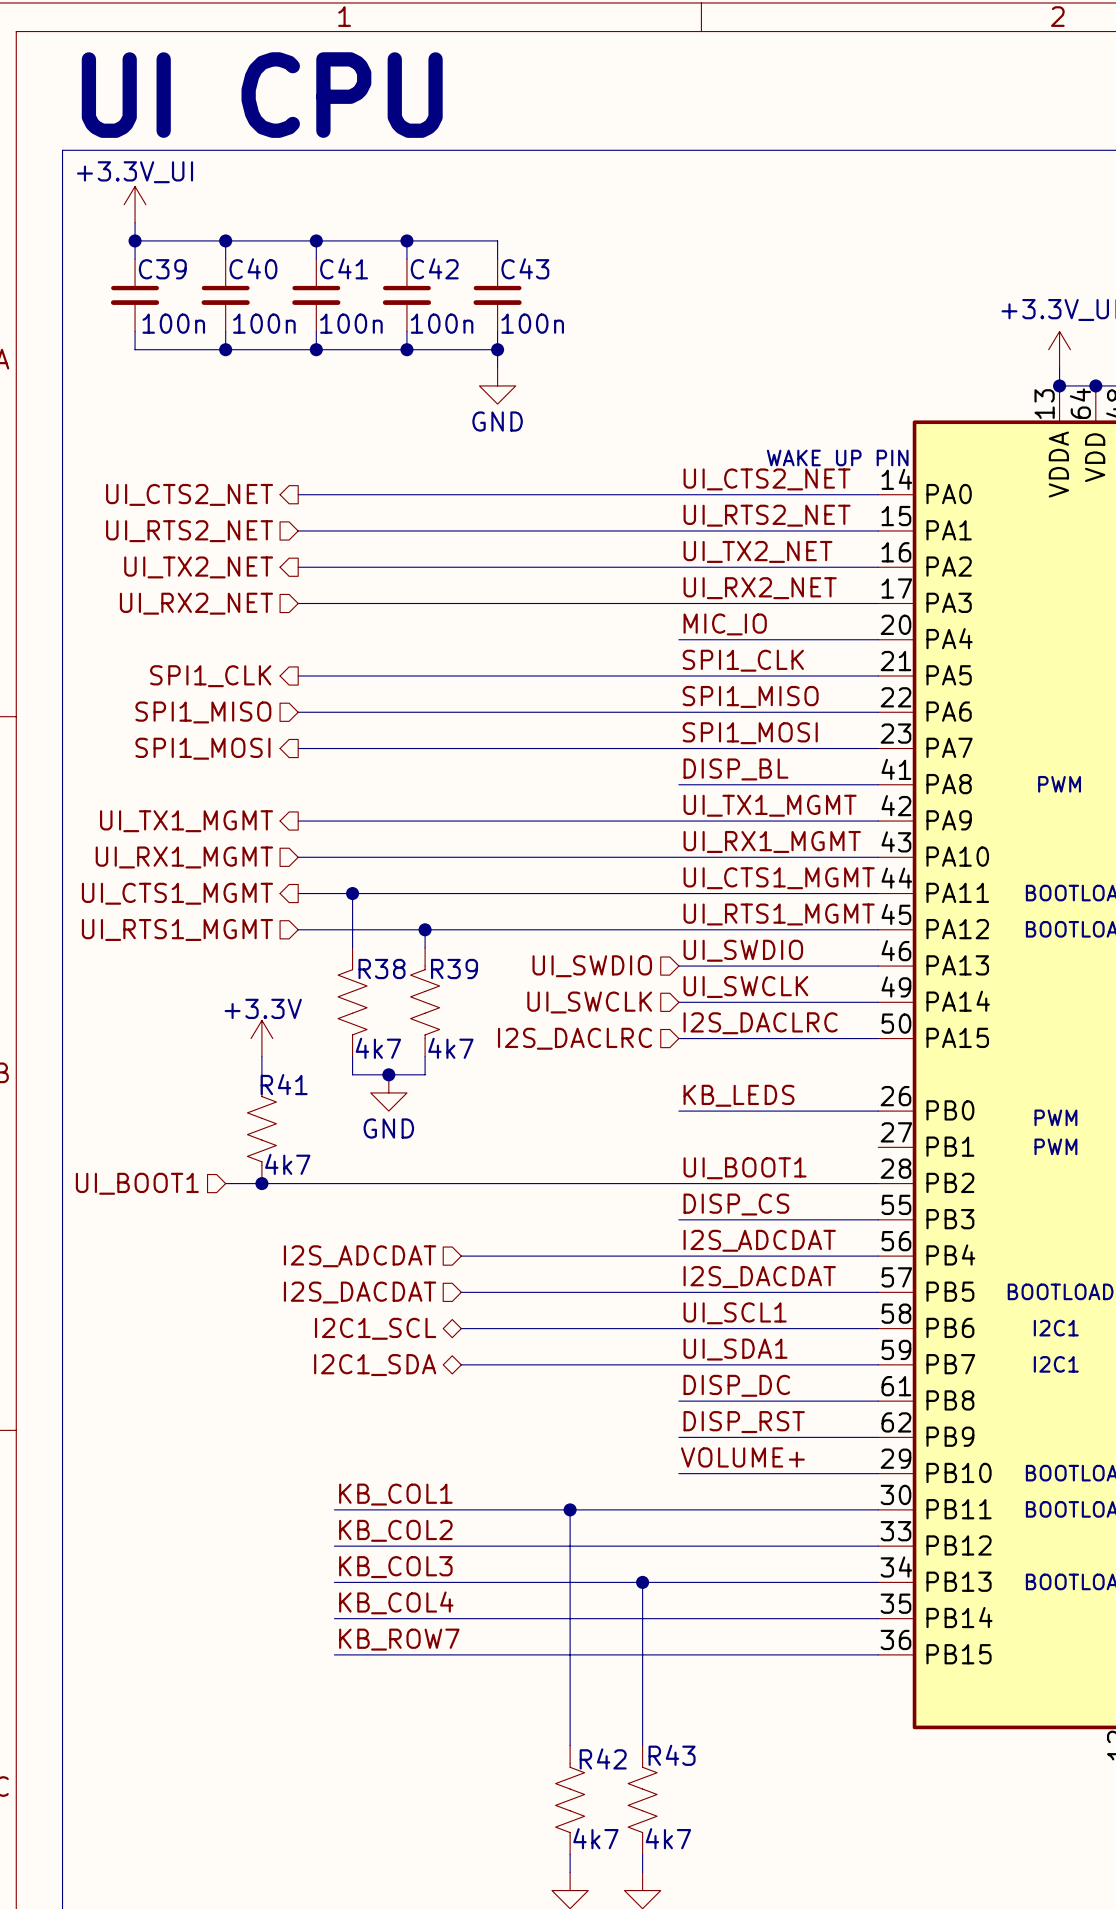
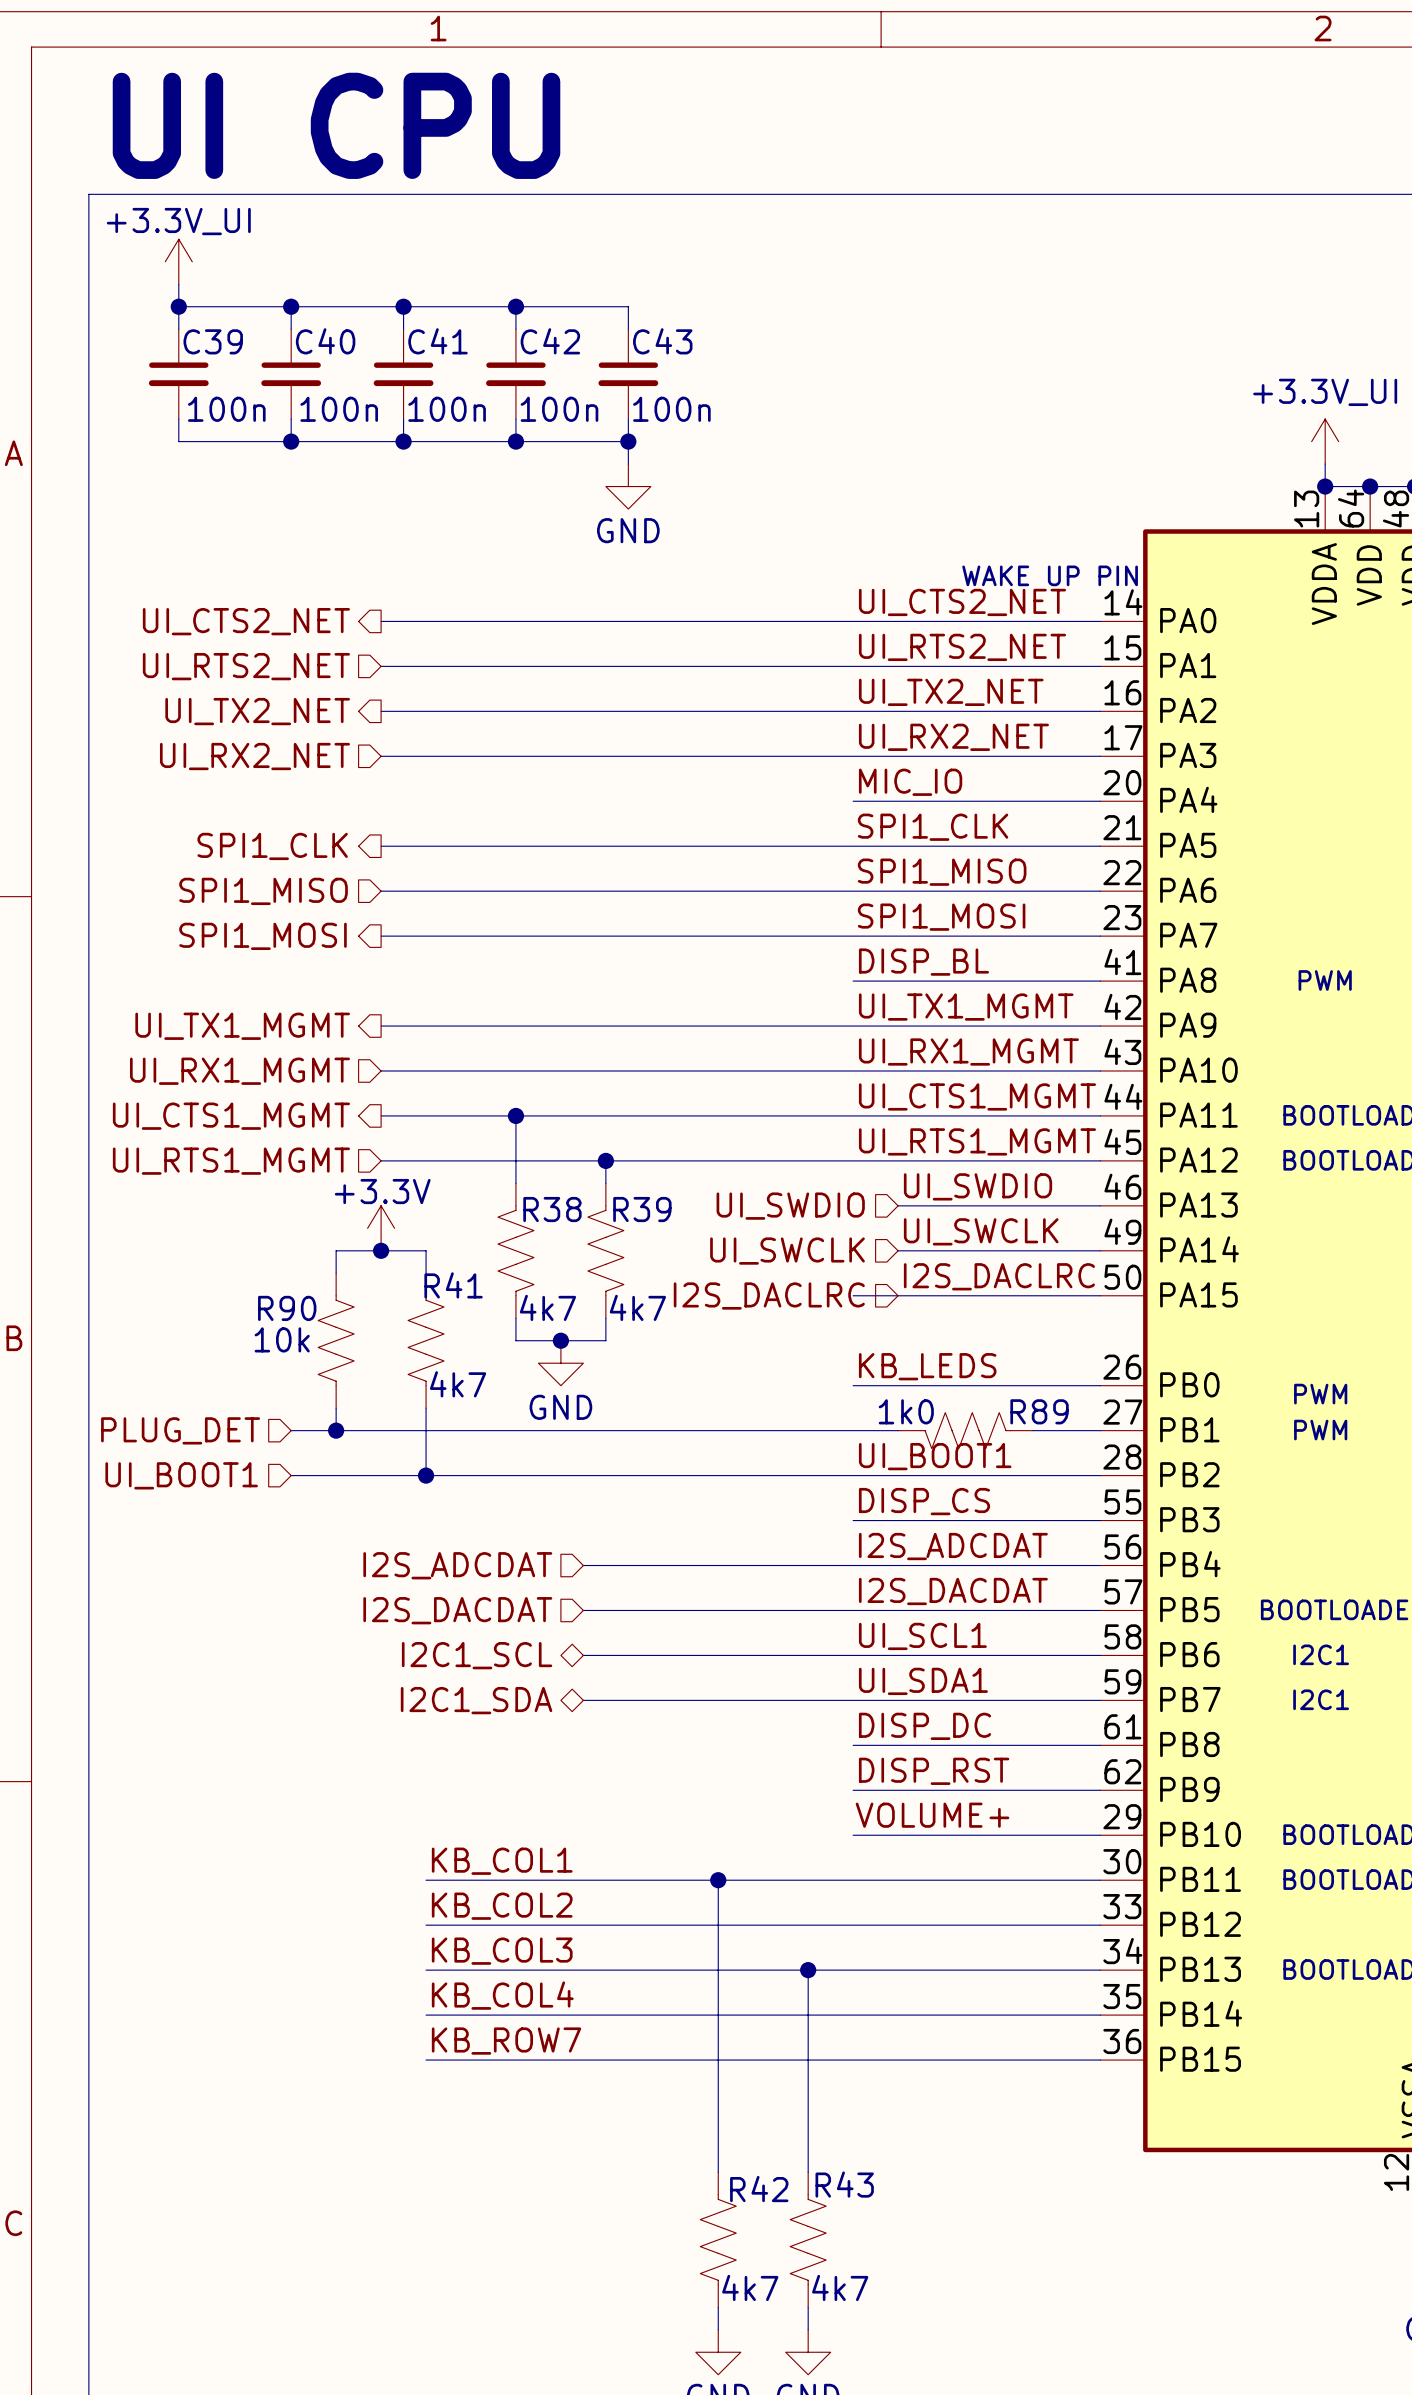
wire: (352, 893) (352, 947) -> (515, 1115) (515, 1183)
junction: (352, 893) -> none
junction: none -> (515, 1115)
wire: (425, 929) (425, 947) -> (605, 1160) (605, 1183)
junction: (425, 929) -> none
junction: none -> (605, 1160)
label position: UI_SWDIO (743, 950) -> UI_SWDIO (978, 1186)
hierarchical label position: UI_SWDIO (592, 966) -> UI_SWDIO (790, 1206)
wire: (678, 966) (715, 966) -> none
label position: UI_SWCLK (745, 986) -> UI_SWCLK (981, 1231)
junction: none -> (381, 1250)
R38 position: (352, 1002) -> (515, 1250)
R39 position: (425, 1002) -> (605, 1250)
hierarchical label position: UI_SWCLK (589, 1002) -> UI_SWCLK (787, 1251)
wire: (678, 1002) (715, 1002) -> none
wire: none -> (336, 1273) (336, 1250) (426, 1250) (426, 1273)
label position: I2S_DACLRC (760, 1023) -> I2S_DACLRC (999, 1276)
power symbol position: +3.3V (261, 1038) -> +3.3V (381, 1228)
hierarchical label position: I2S_DACLRC (575, 1038) -> I2S_DACLRC (769, 1296)
wire: (261, 1056) (261, 1074) -> (336, 1408) (336, 1430)
wire: (352, 1056) (352, 1074) (406, 1074) -> (515, 1318) (515, 1340)
wire: (425, 1056) (425, 1074) -> (605, 1318) (605, 1340) (538, 1340)
R90: none -> 10k (336, 1340)
junction position: (388, 1074) -> (560, 1340)
power symbol position: GND (388, 1092) -> GND (560, 1363)
R41 position: (261, 1129) -> (426, 1340)
wire: none -> (426, 1408) (426, 1475)
hierarchical label: none -> PLUG_DET (180, 1430)
wire: none -> (291, 1430) (898, 1430)
junction: none -> (336, 1430)
R89: none -> 1k0 (965, 1430)
wire: none -> (1032, 1430) (1100, 1430)
junction: (261, 1183) -> none
junction: none -> (426, 1475)

